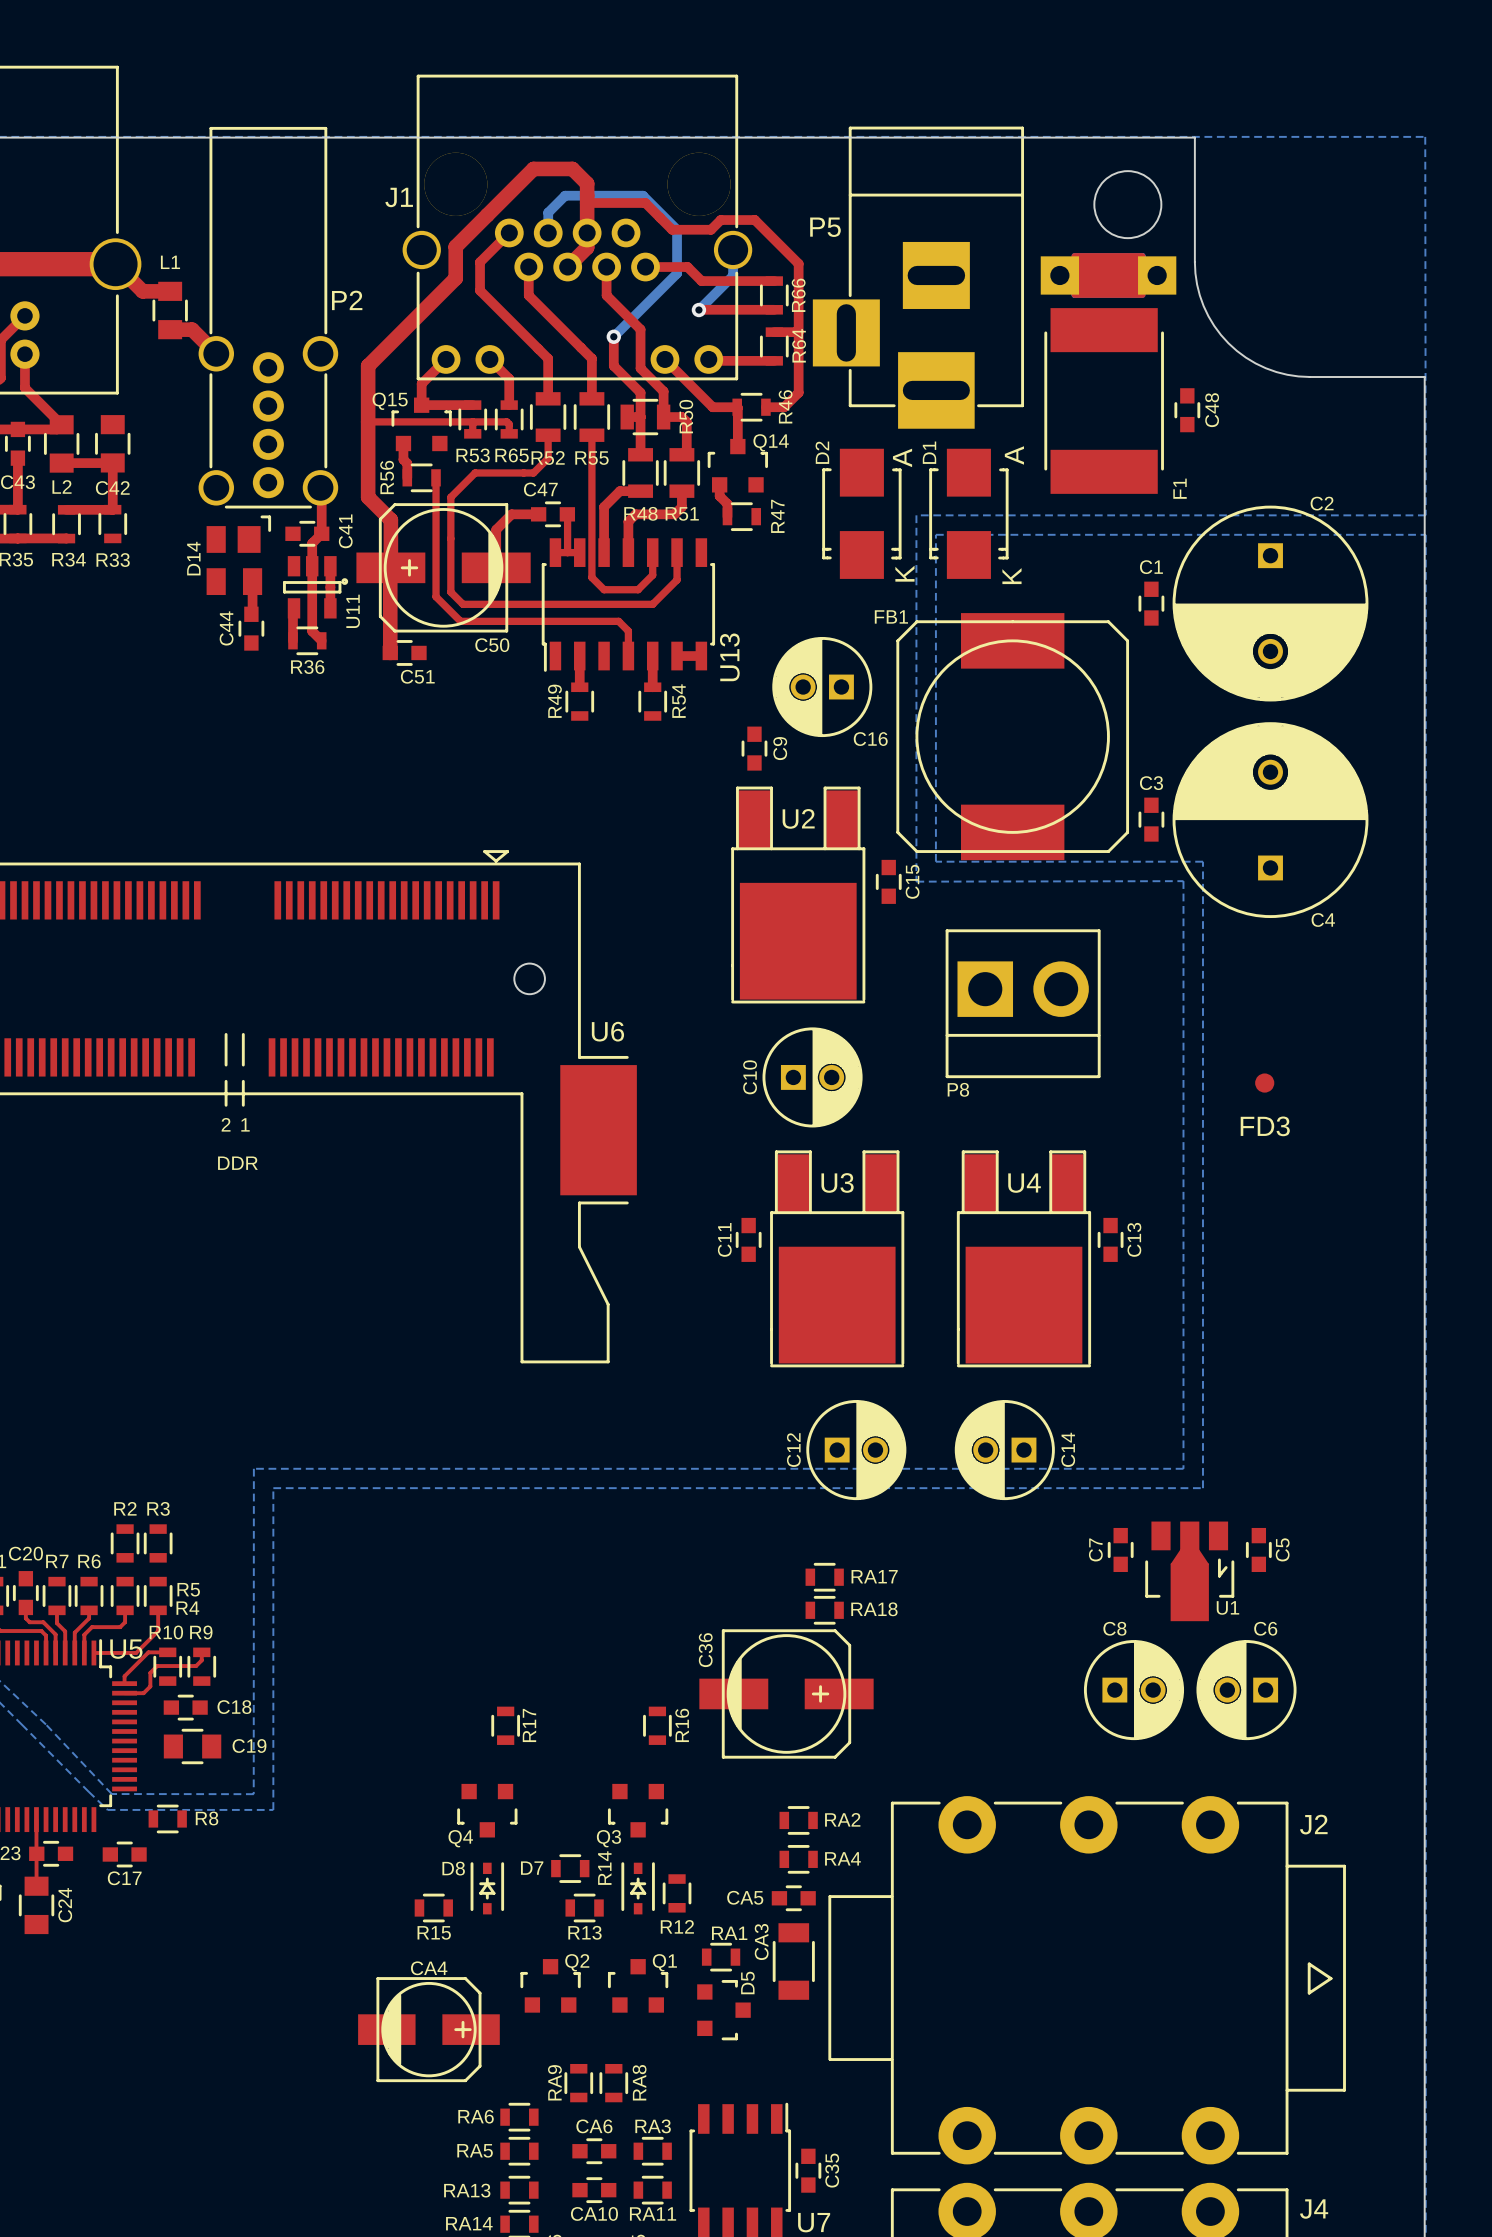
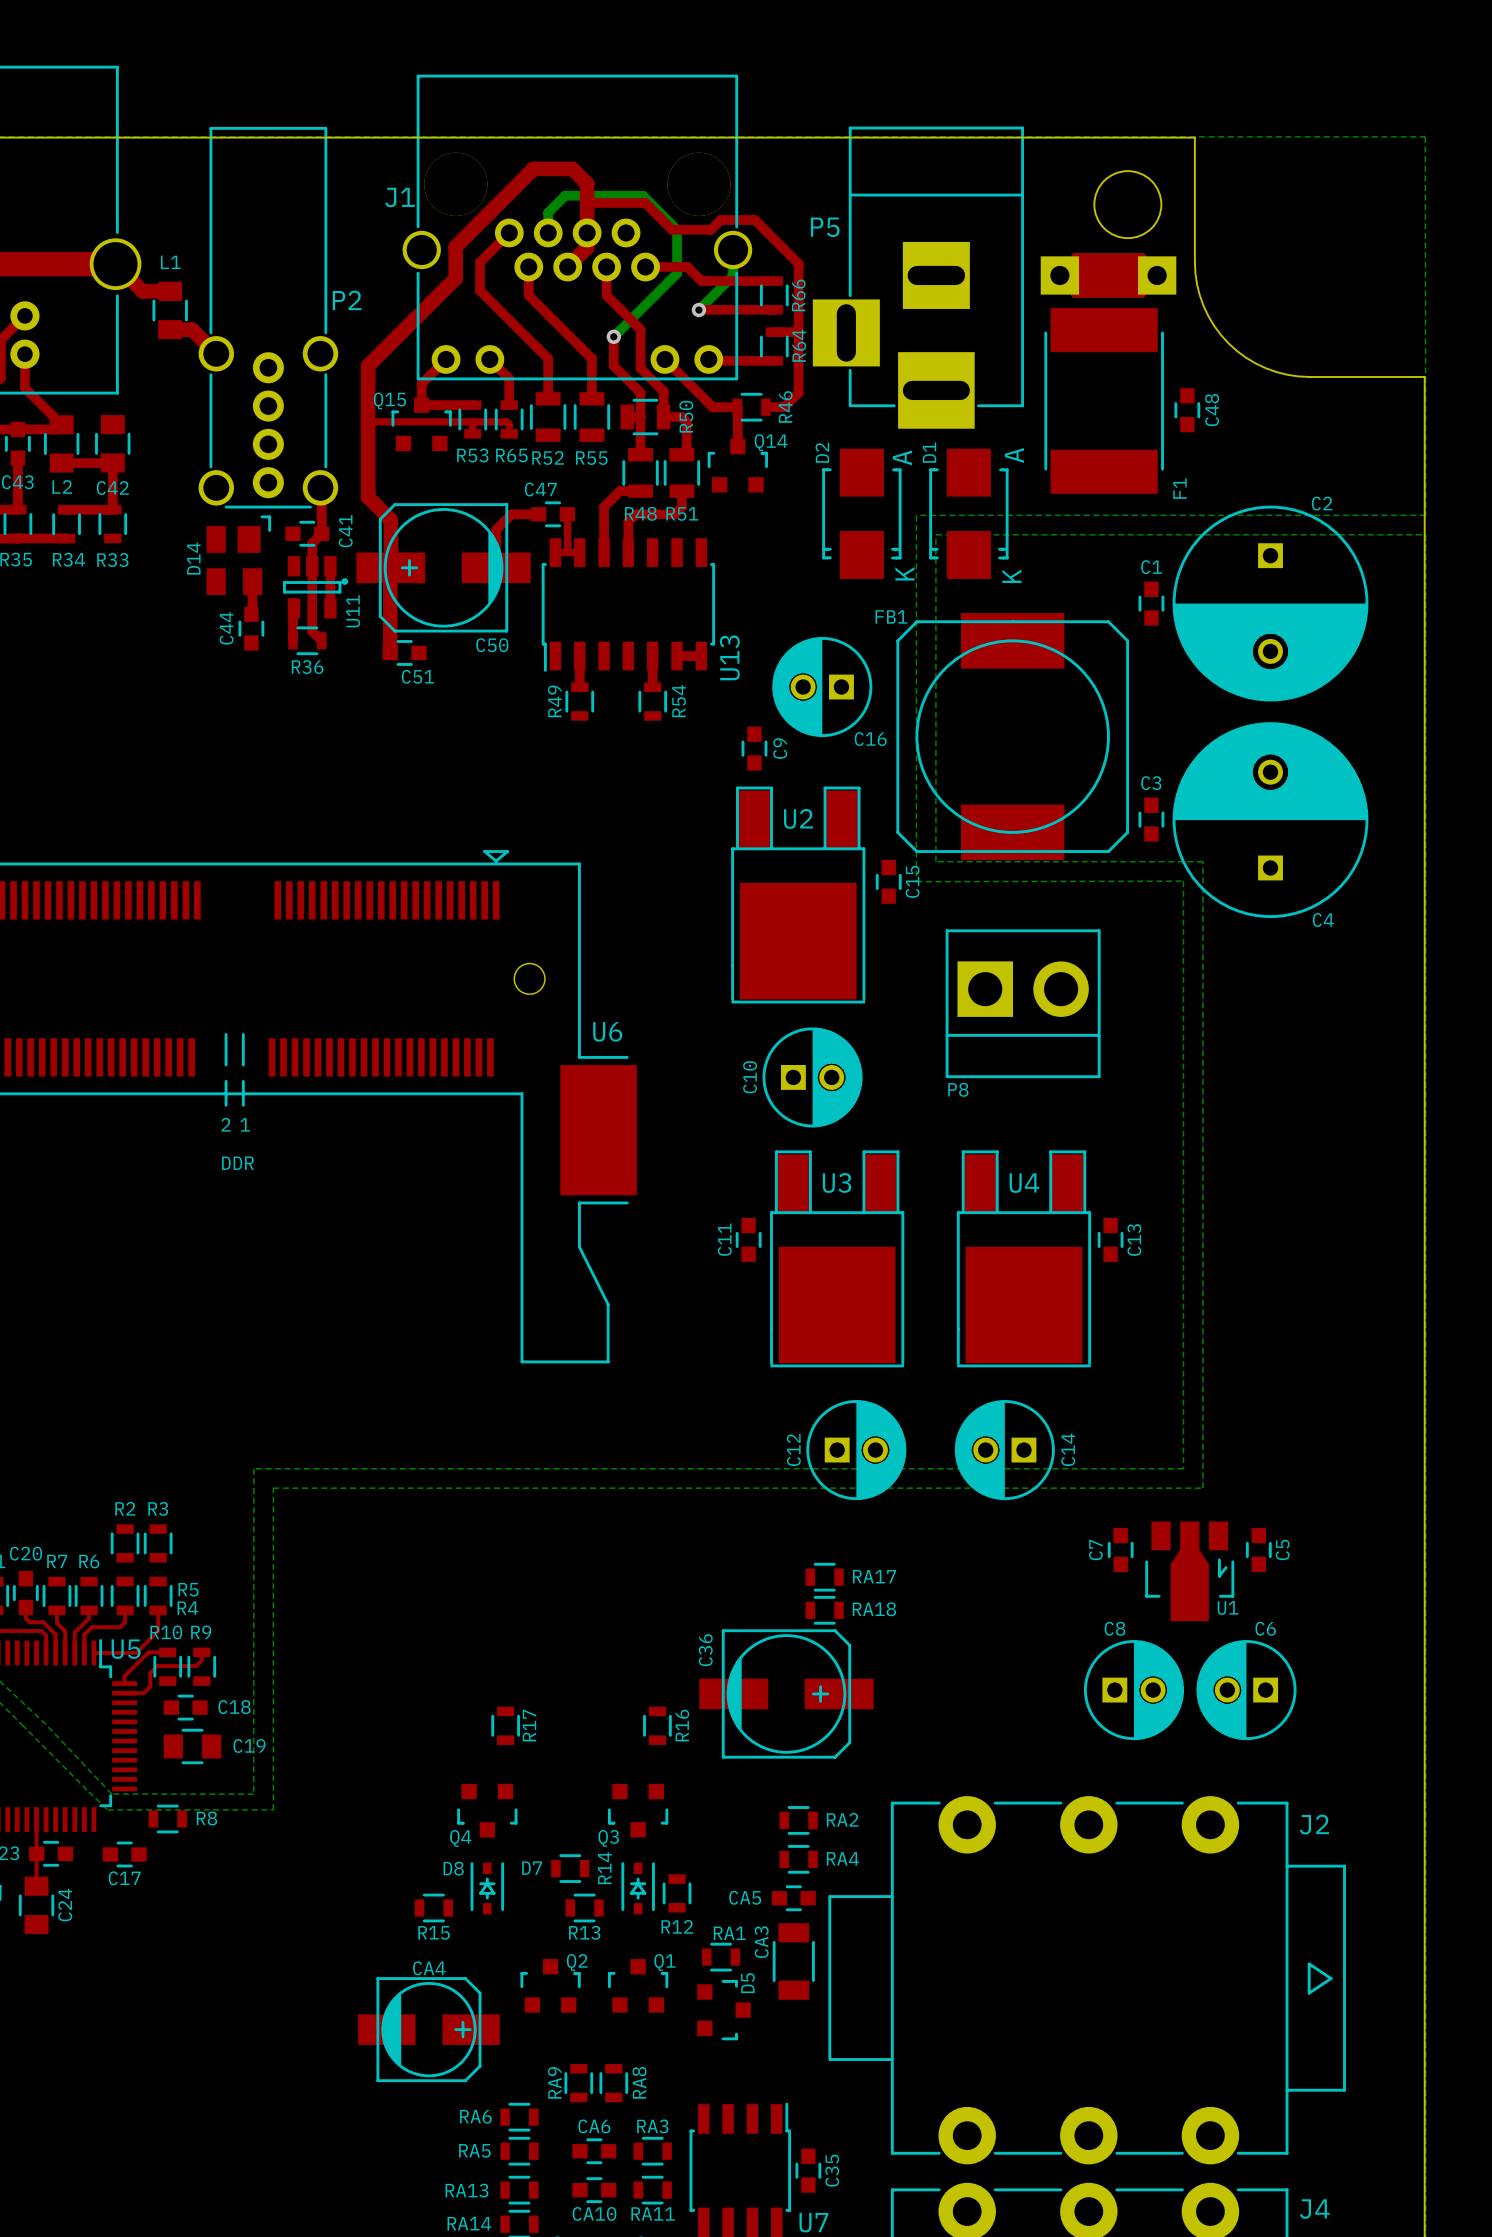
top track: (548, 435) (548, 458) (533, 472) (475, 472) (450, 497) (450, 592) (463, 604) (652, 604) (677, 580) (677, 552) -> none
top track: (591, 435) (591, 577) (604, 589) (638, 589) (652, 575) (652, 552) -> none
top track: (403, 443) (403, 459) (407, 463) (407, 477) -> none
R56: (421, 477) -> none
top track: (436, 477) (436, 596) (460, 621) (618, 621) (628, 631) (628, 656) -> none
top track: (719, 484) (719, 496) (727, 503) (727, 516) -> none
R47: (741, 516) -> none
FD3: (1264, 1083) -> none

